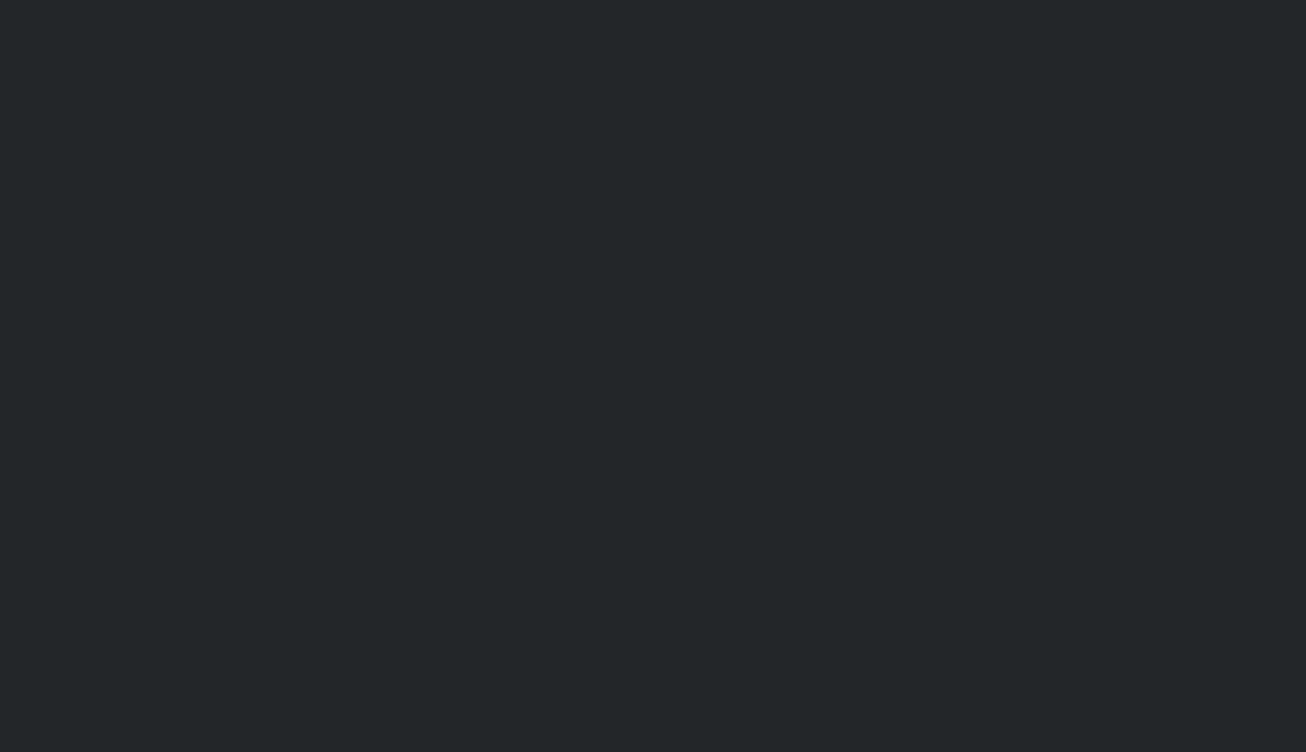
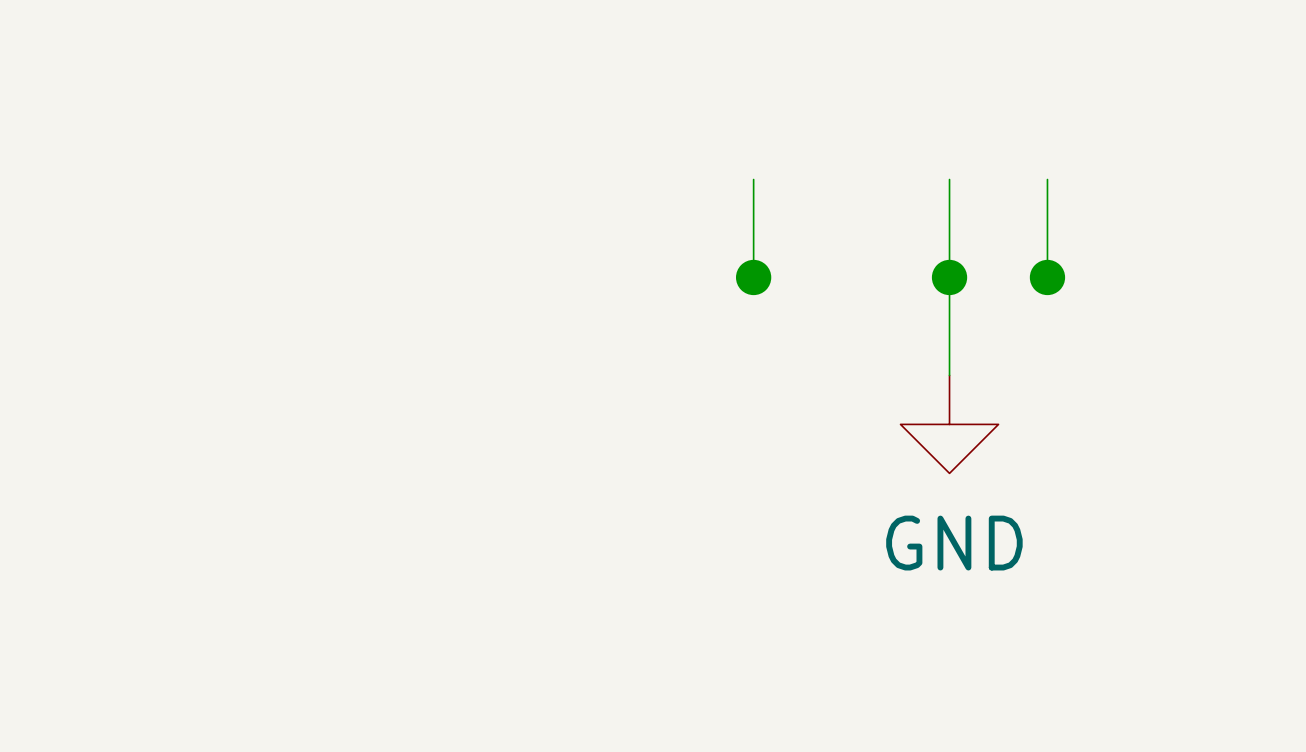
wire: none -> (753, 179) (753, 277)
wire: none -> (949, 179) (949, 375)
wire: none -> (1047, 179) (1047, 277)
junction: none -> (753, 277)
junction: none -> (949, 277)
junction: none -> (1047, 277)
power symbol: none -> GND (949, 424)

